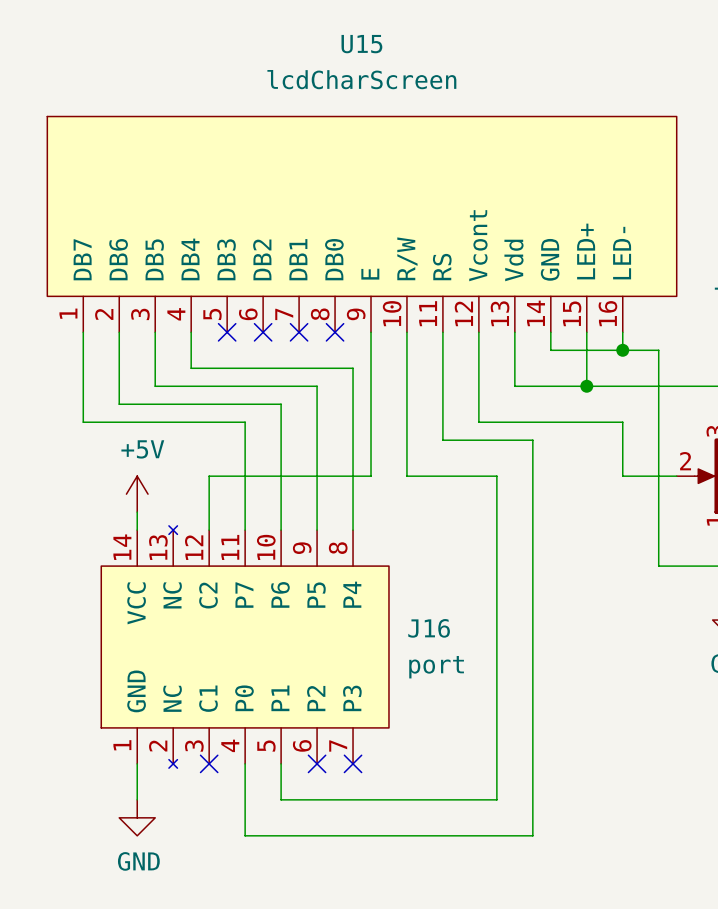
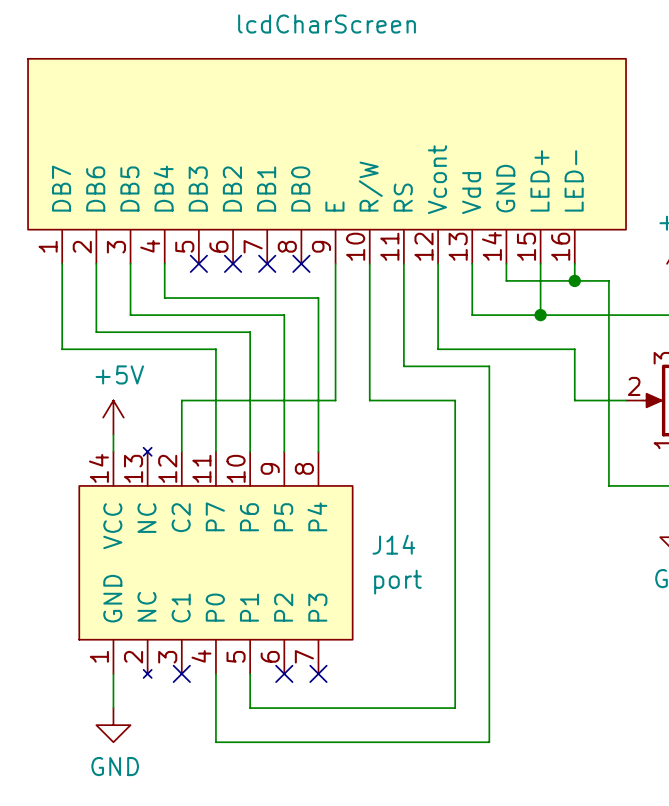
J16 name: J16 (429, 628) -> J14 (393, 544)

